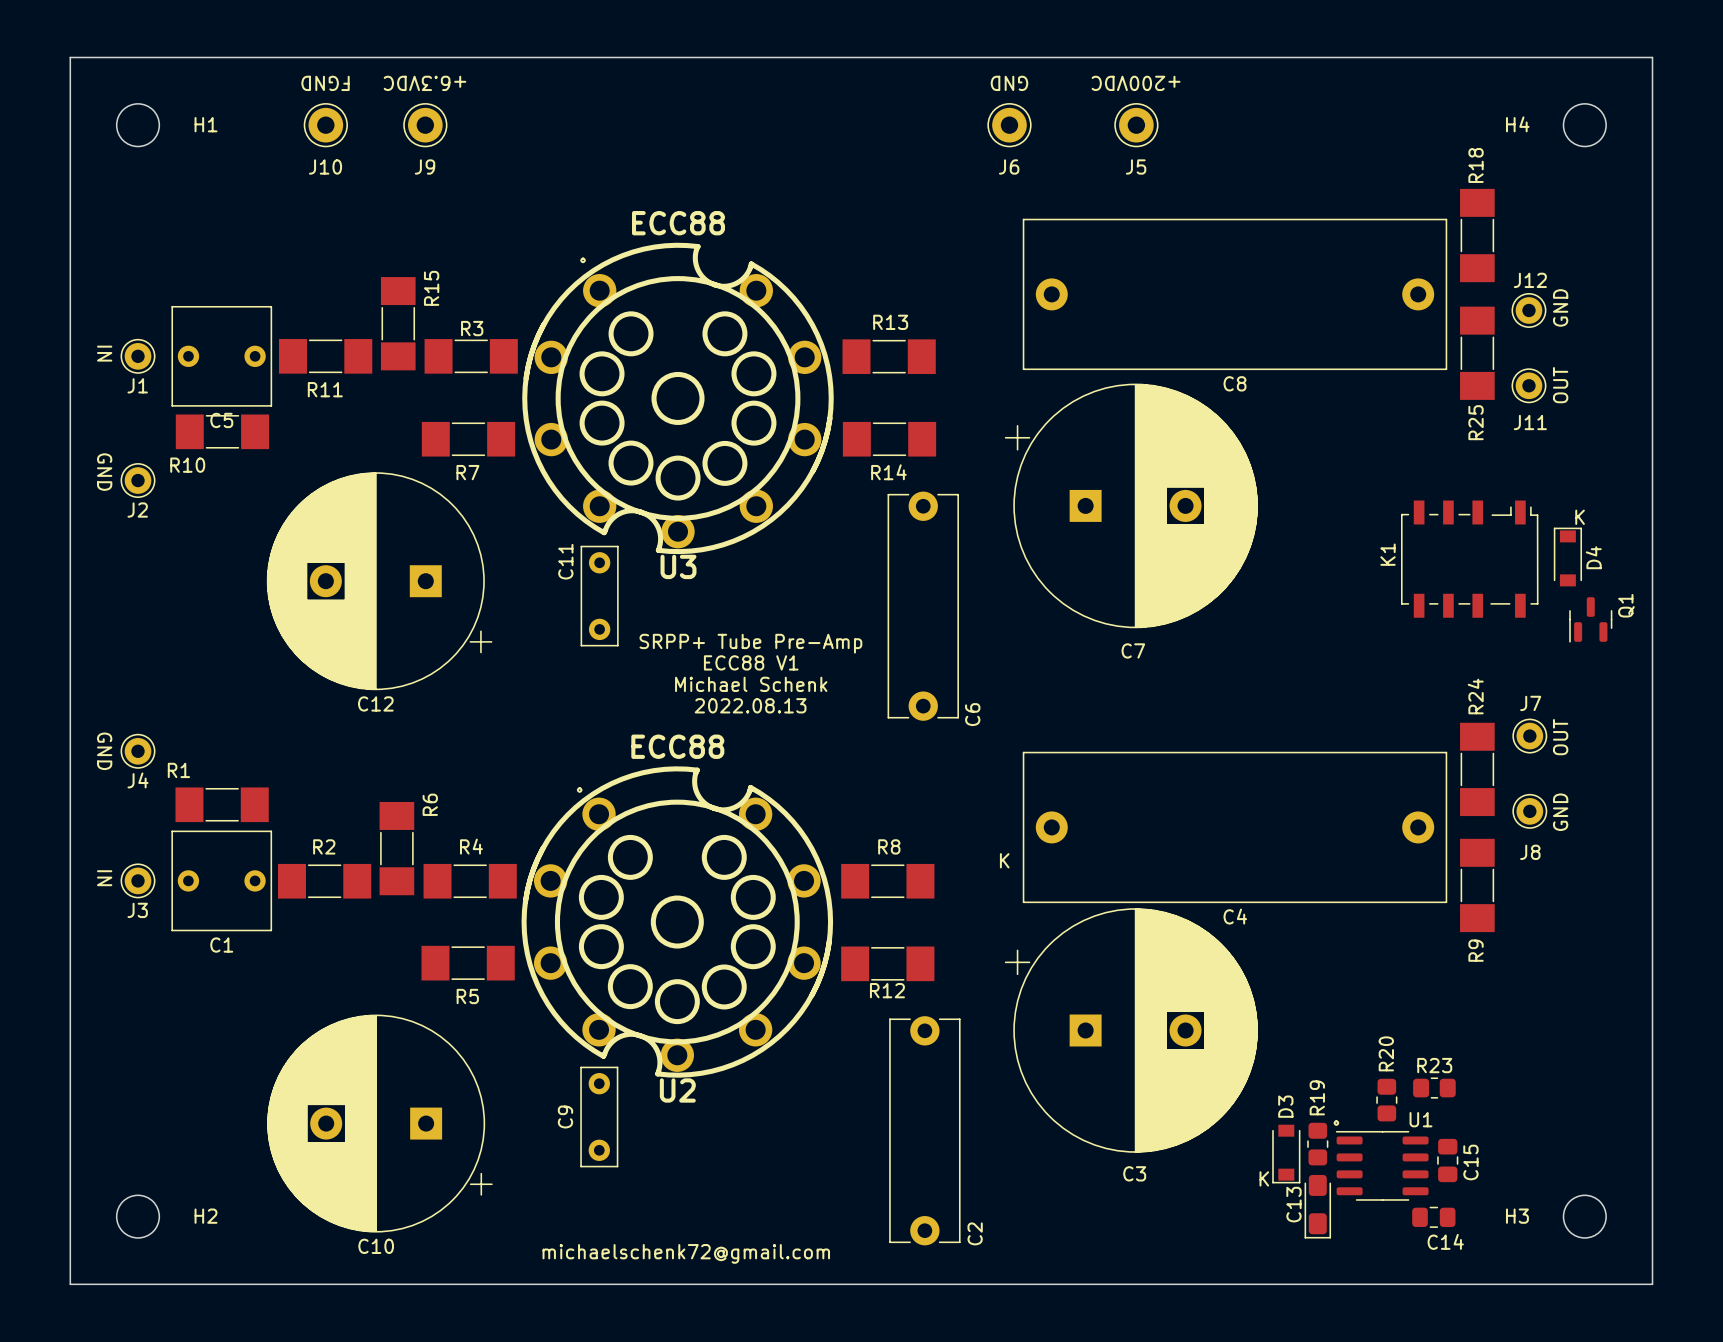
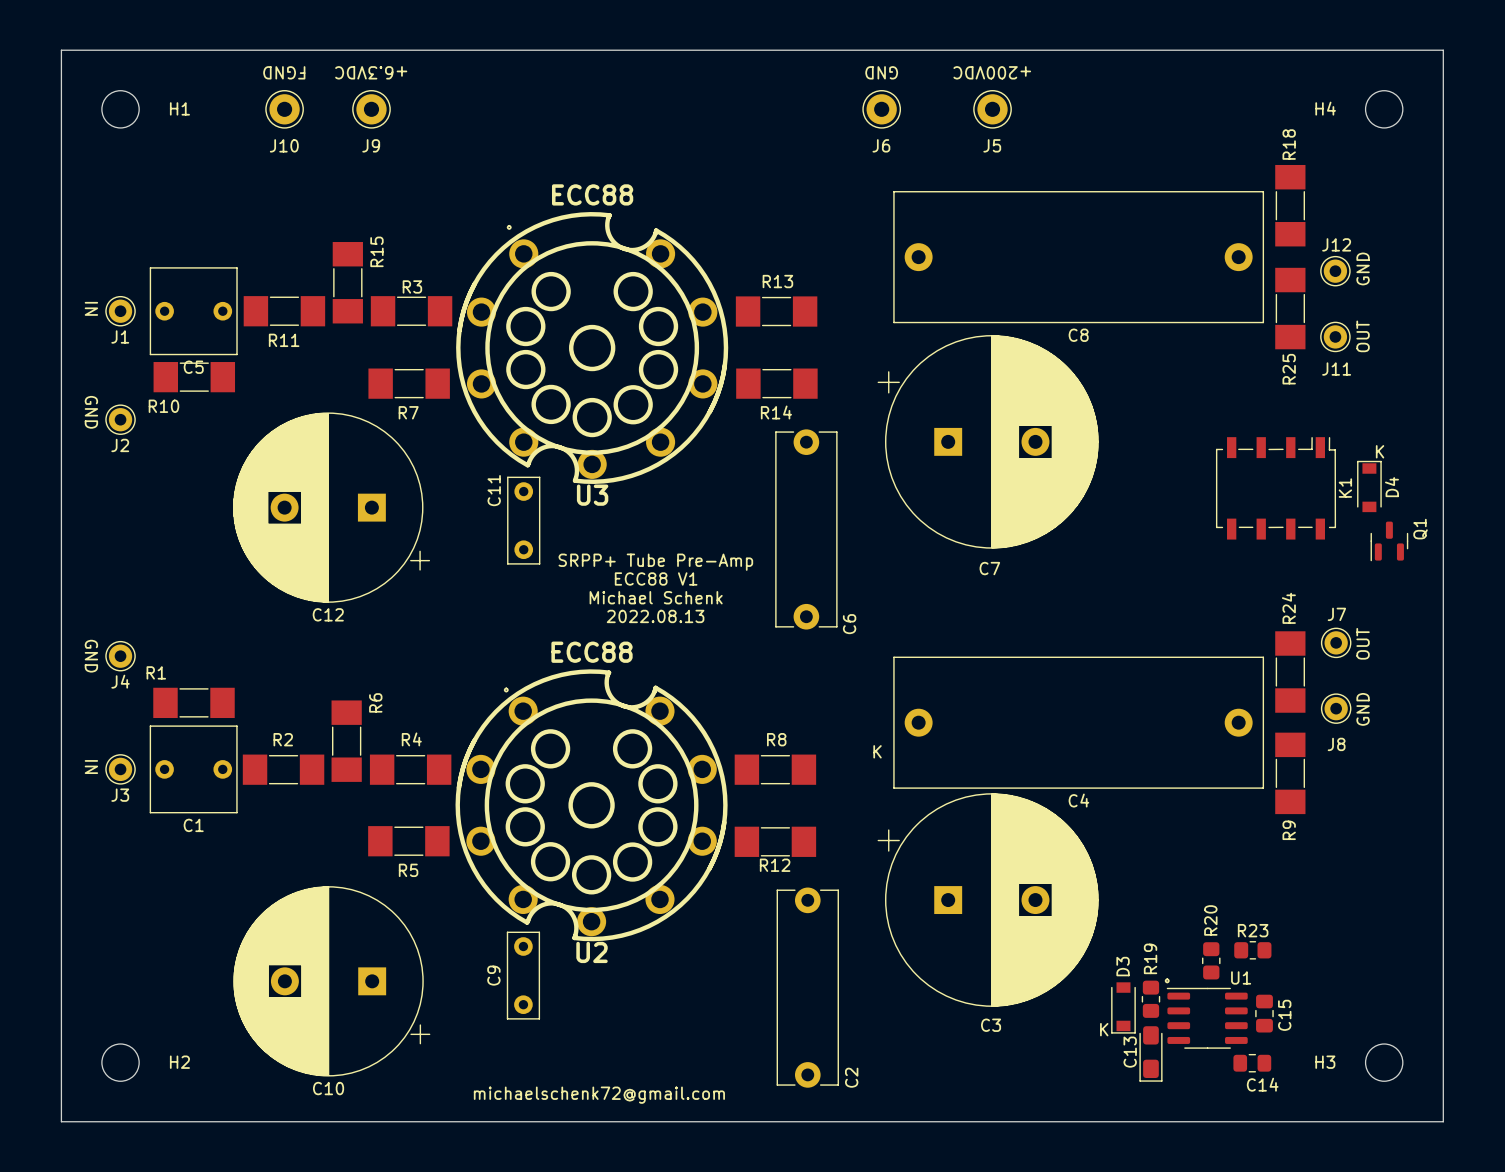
K1 footprint: [1401, 500, 1539, 618] -> [1215, 437, 1337, 540]
K1 name position: K1 (1388, 554) -> K1 (1345, 488)

